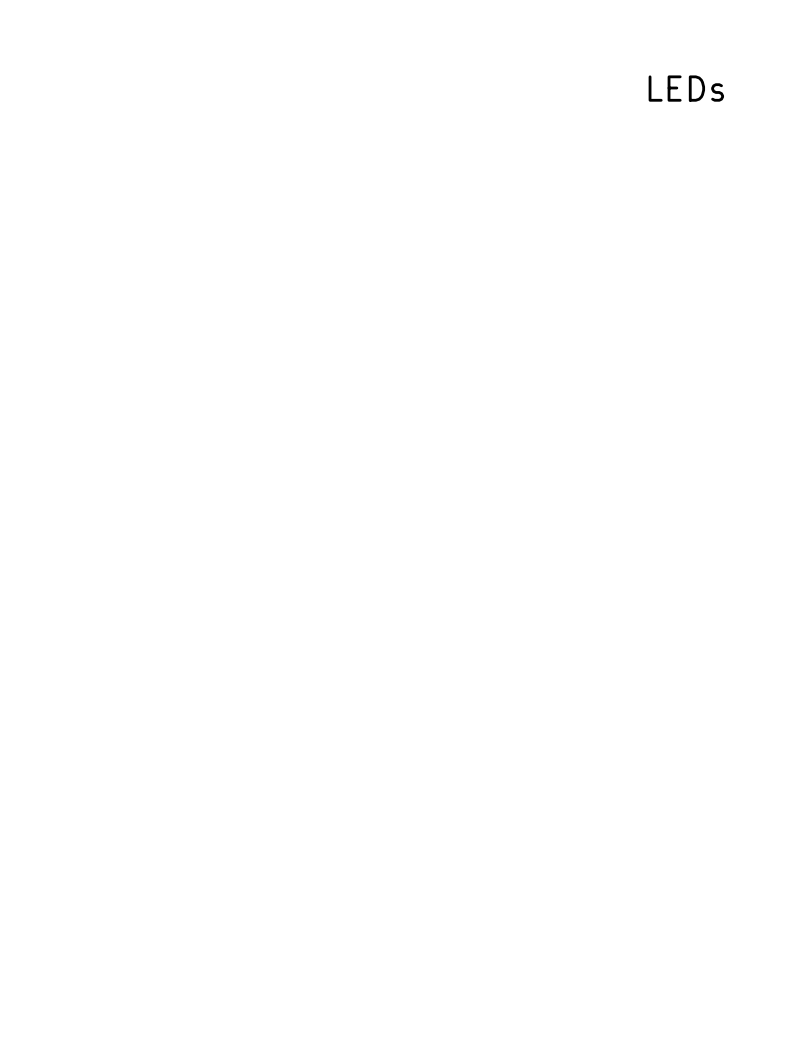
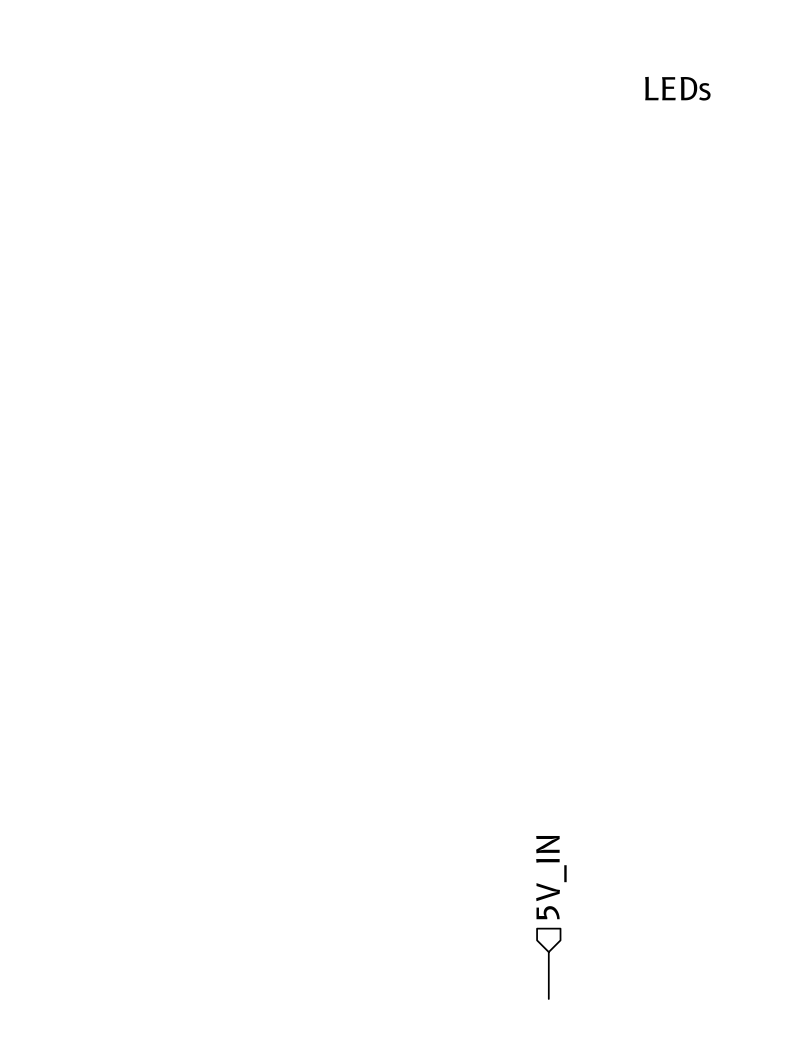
hierarchical label: none -> 5V_IN (551, 877)
wire: none -> (548, 952) (548, 998)

